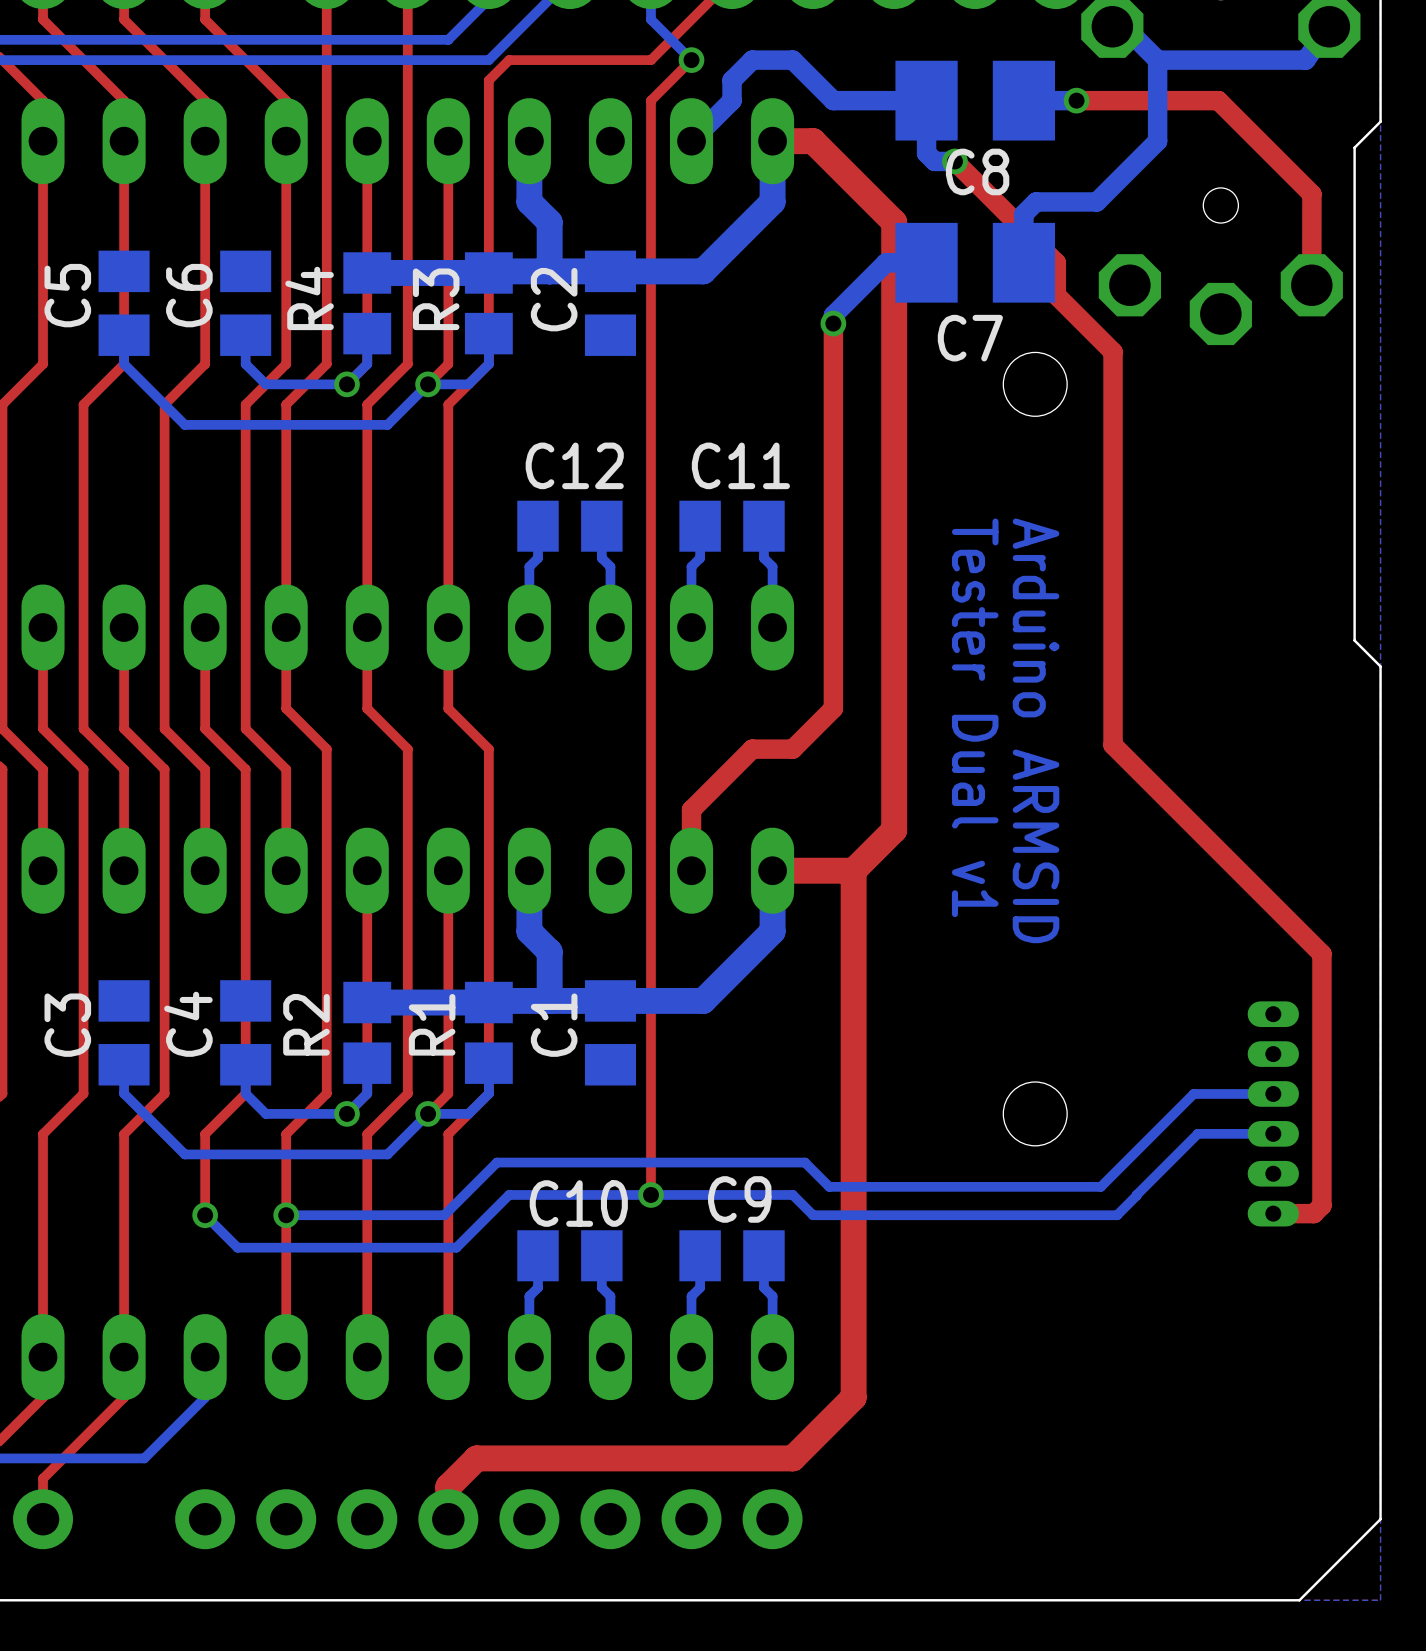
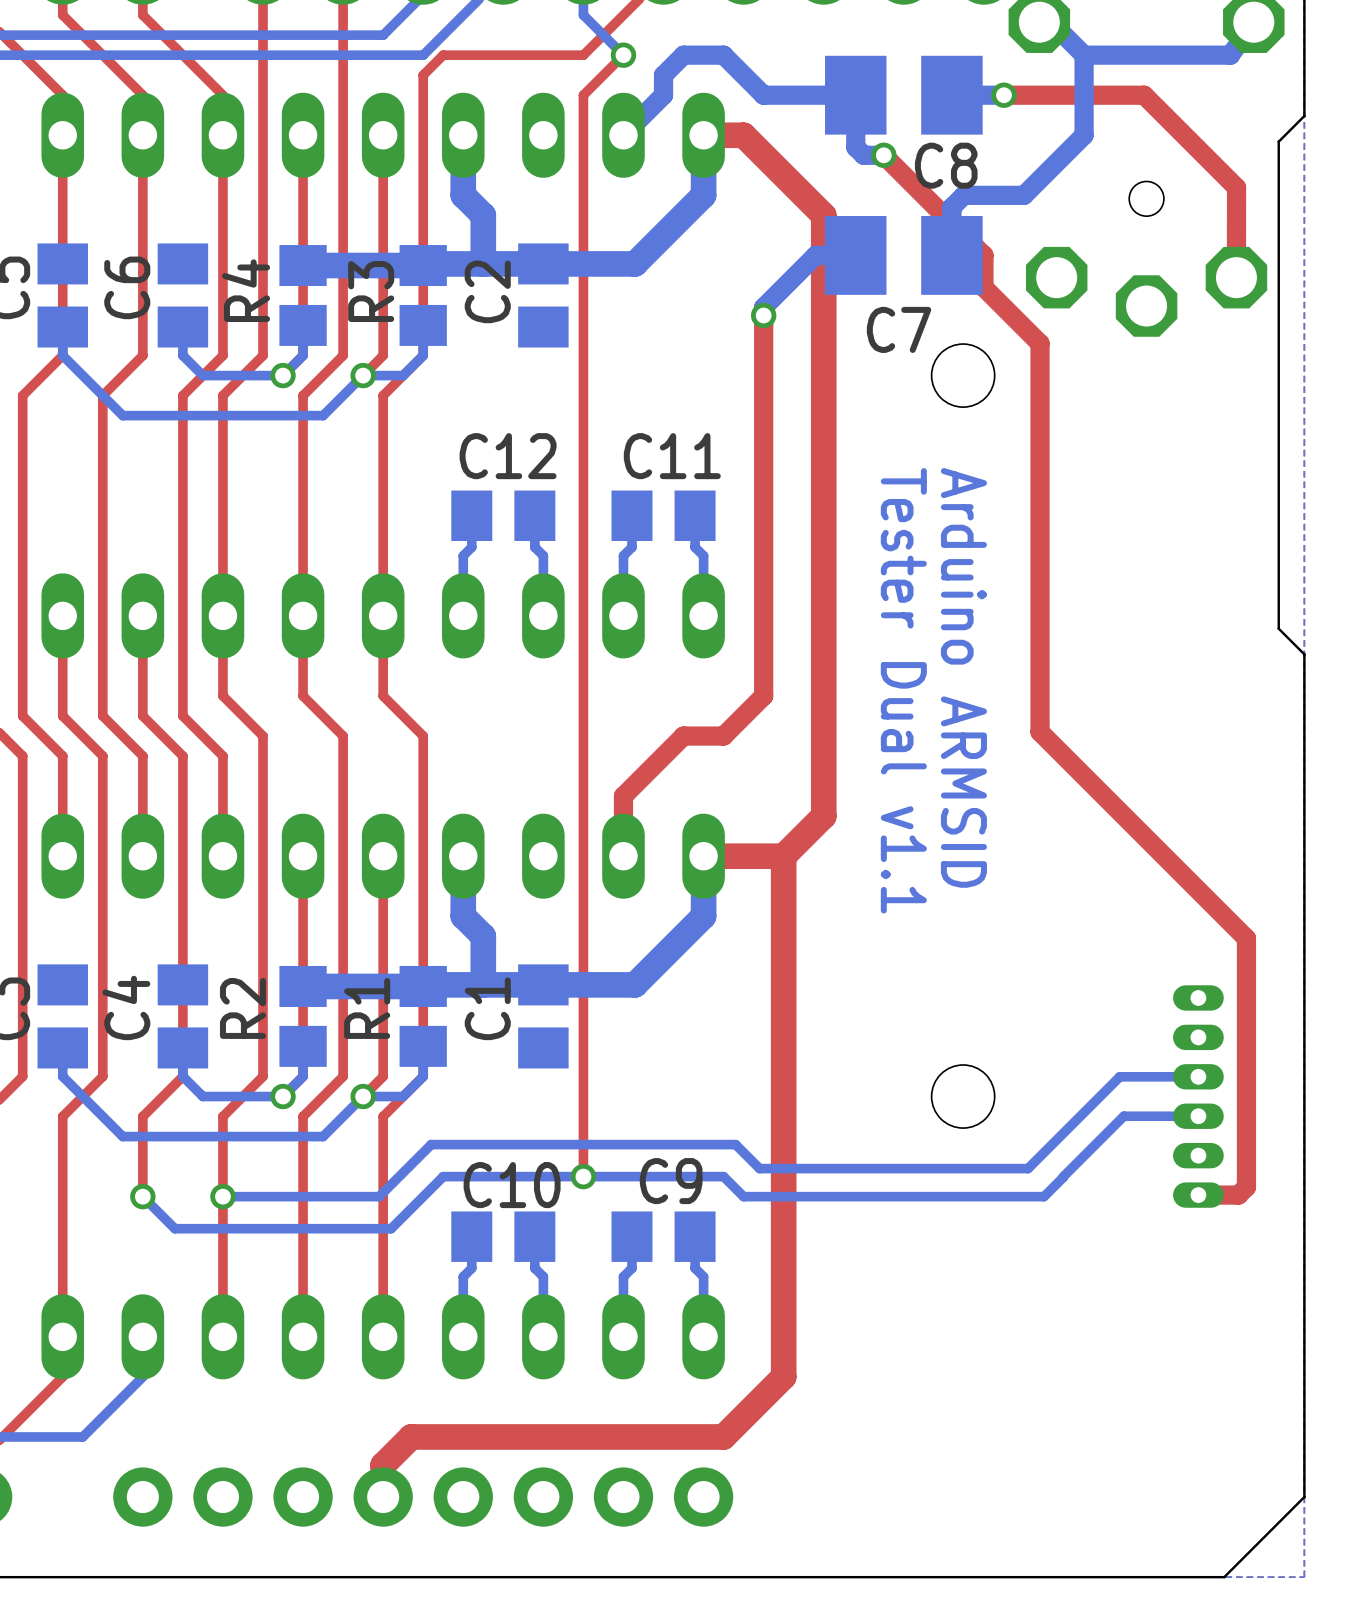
C8 name position: C8 (977, 171) -> C8 (946, 165)
text: Tester Dual v1 (975, 717) -> Tester Dual v1.1 (903, 690)
text position: Arduino ARMSID (1036, 730) -> Arduino ARMSID (963, 677)

